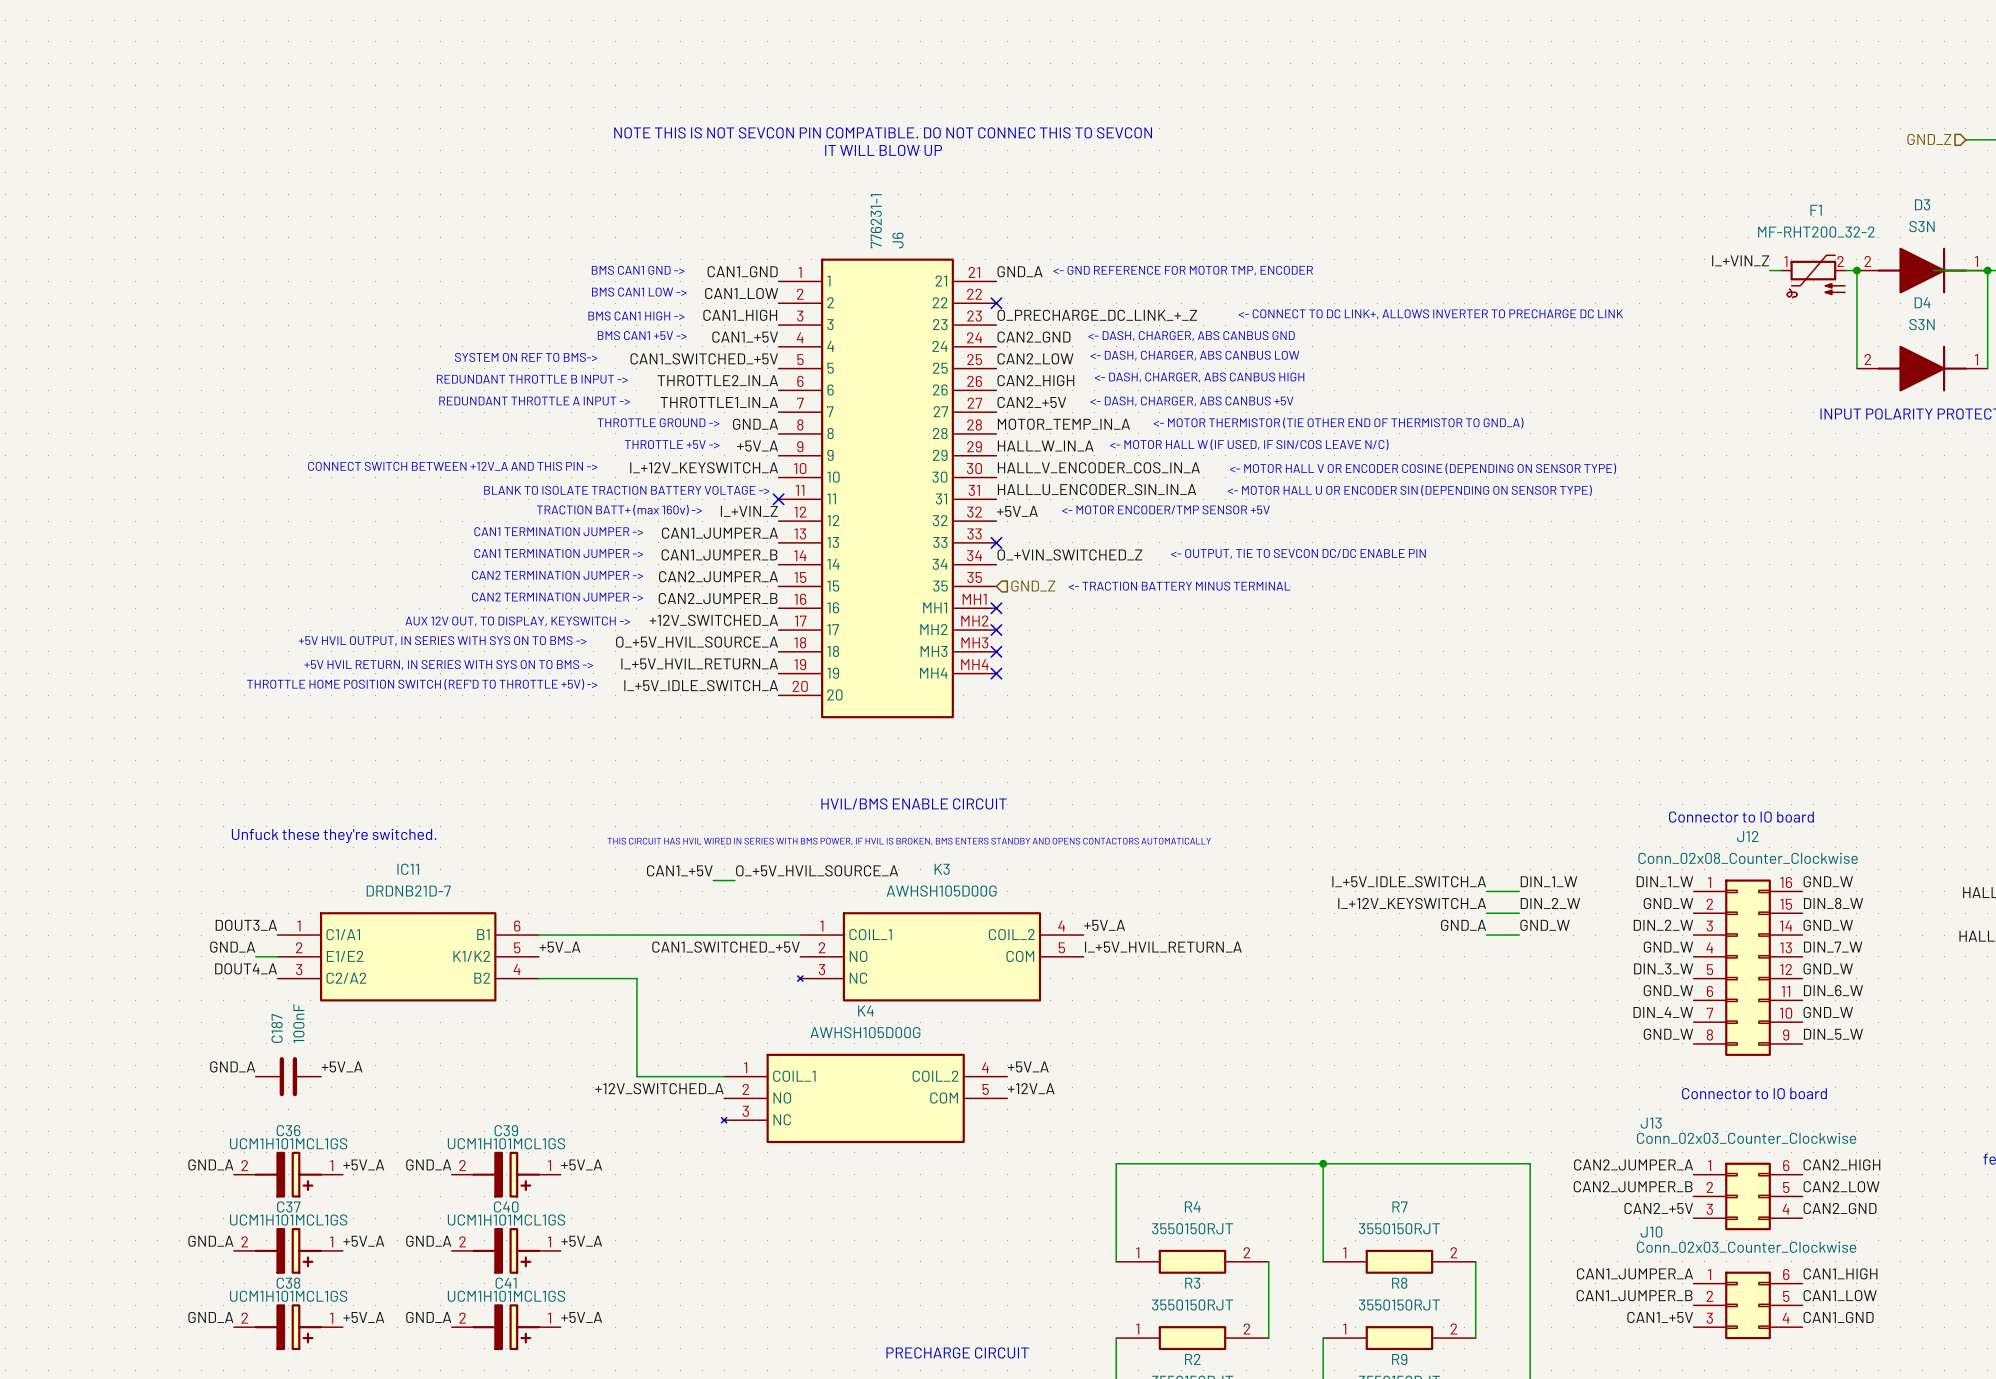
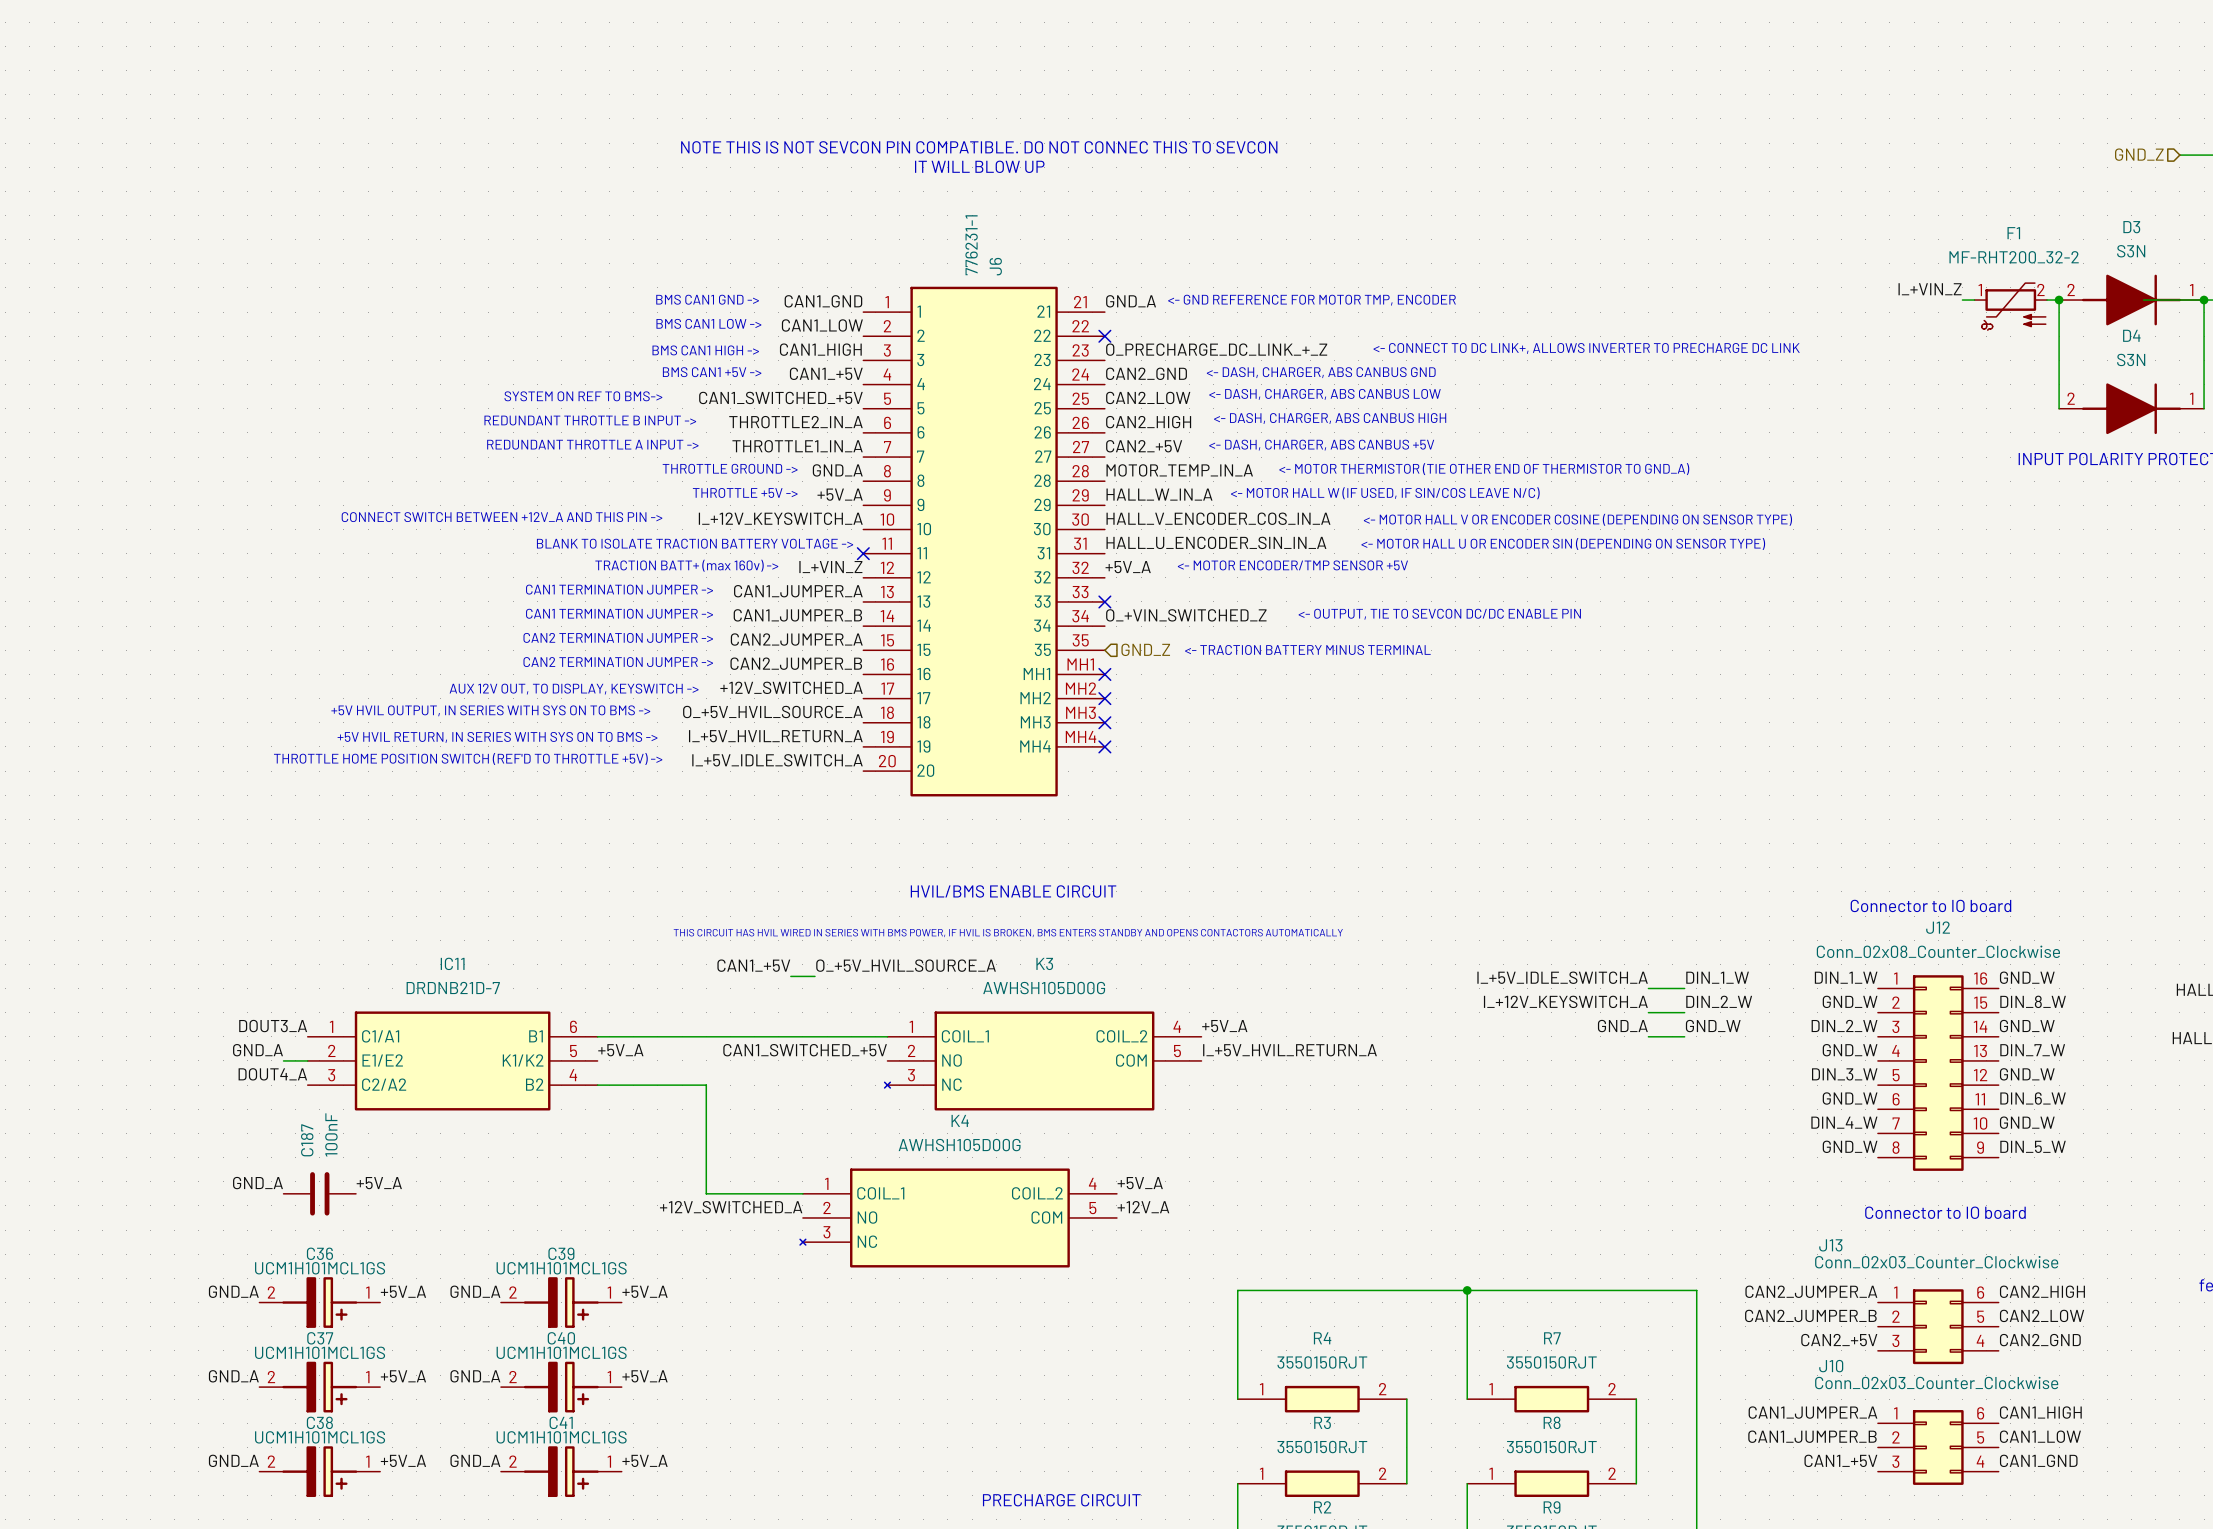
text: Unfuck these they're switched. (334, 835) -> none

